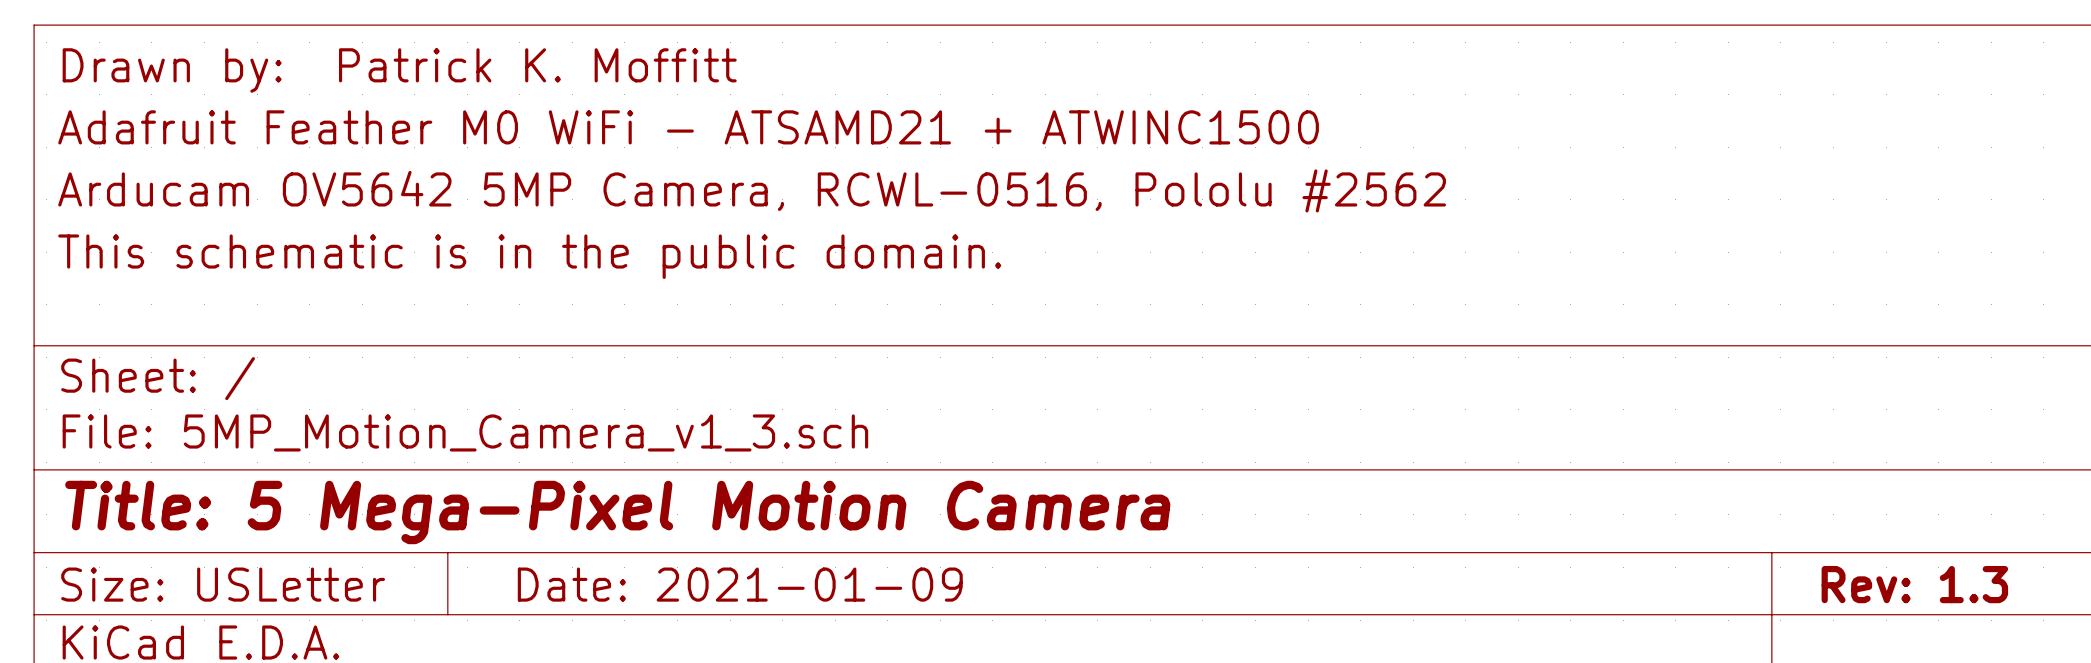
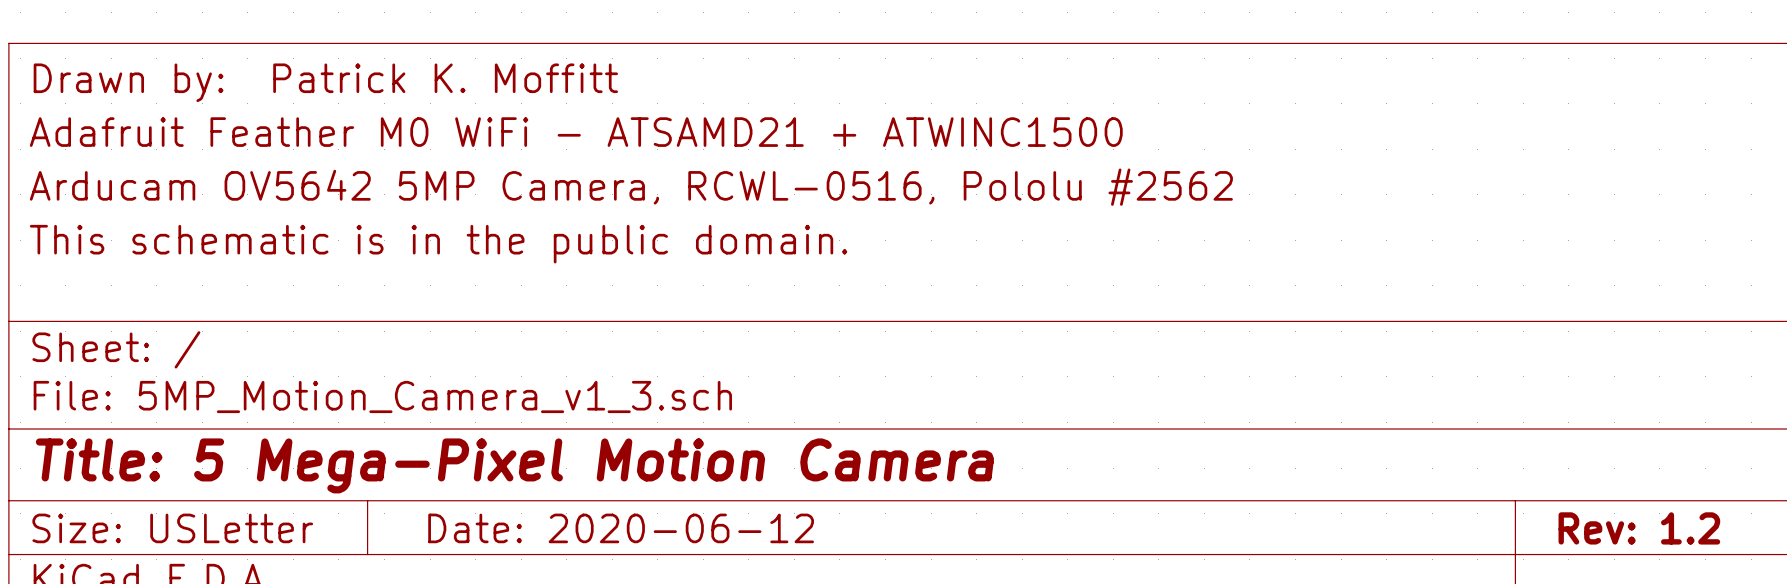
title block: Date: 2021-01-09 (740, 584) -> Date: 2020-06-12 (621, 528)
title block: Rev: 1.3 (1914, 584) -> Rev: 1.2 (1639, 528)

